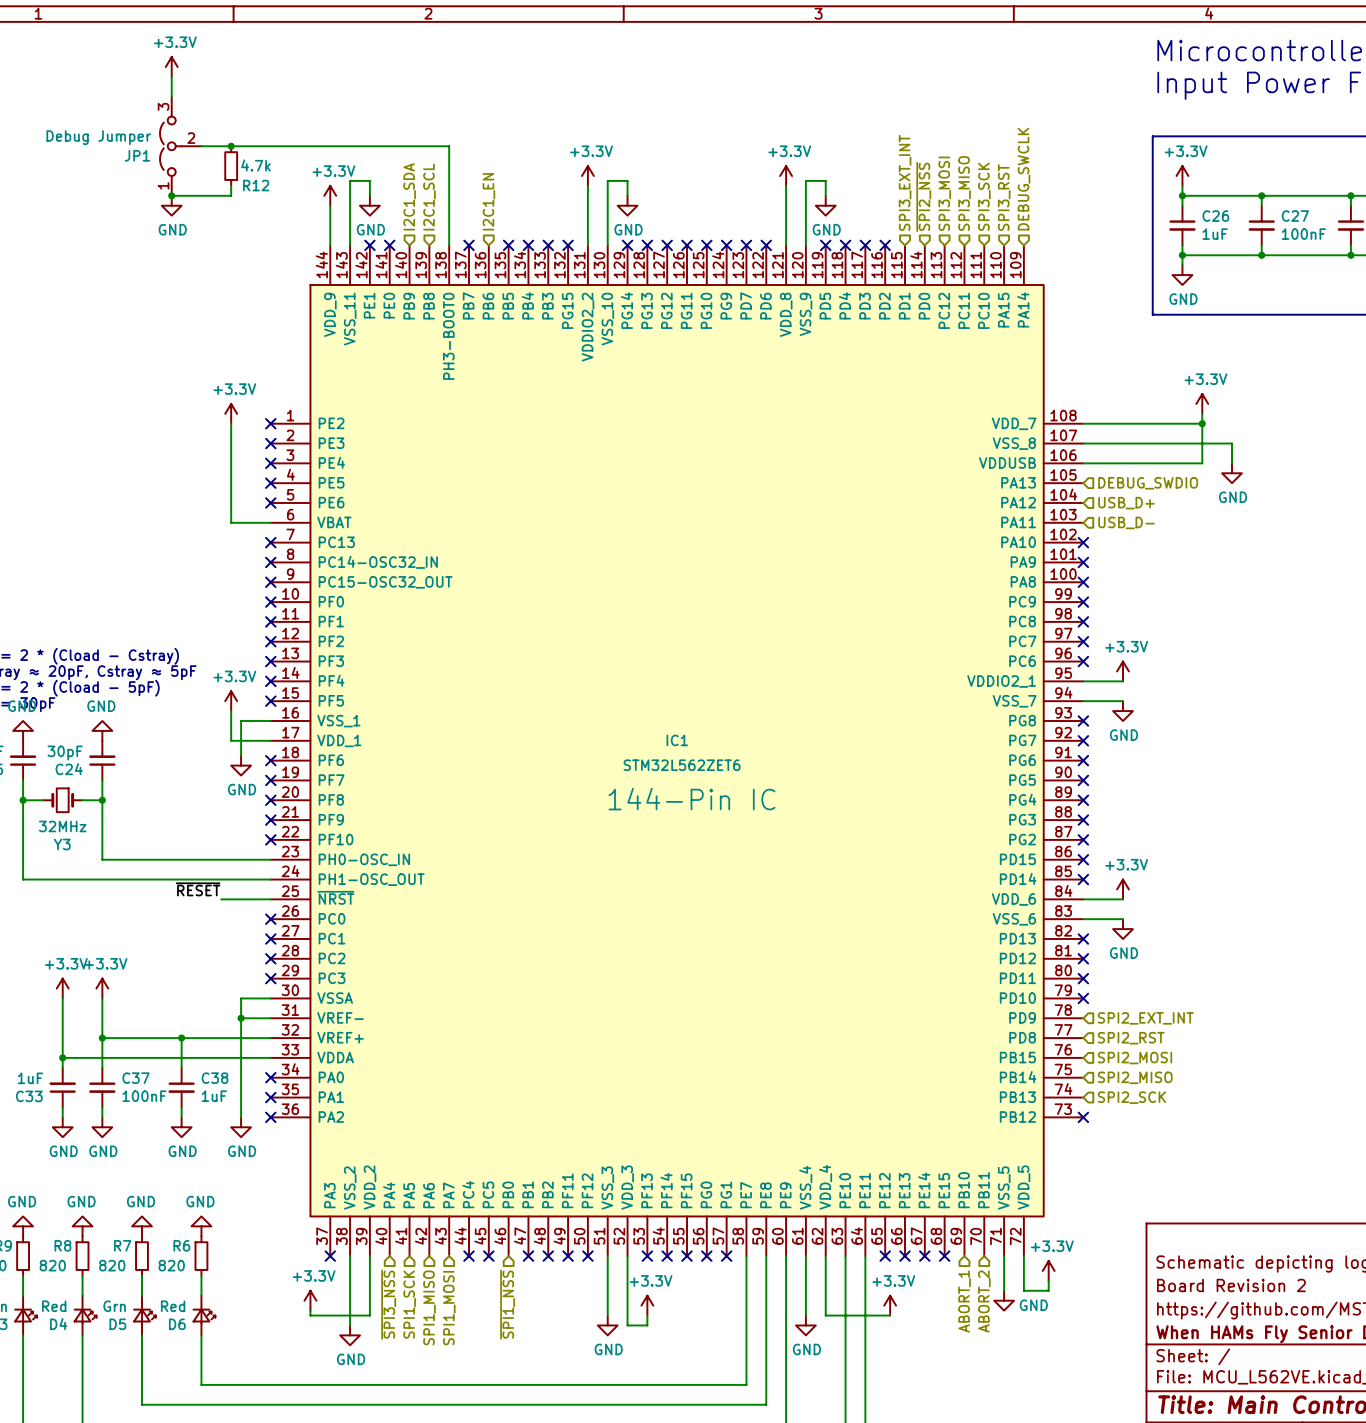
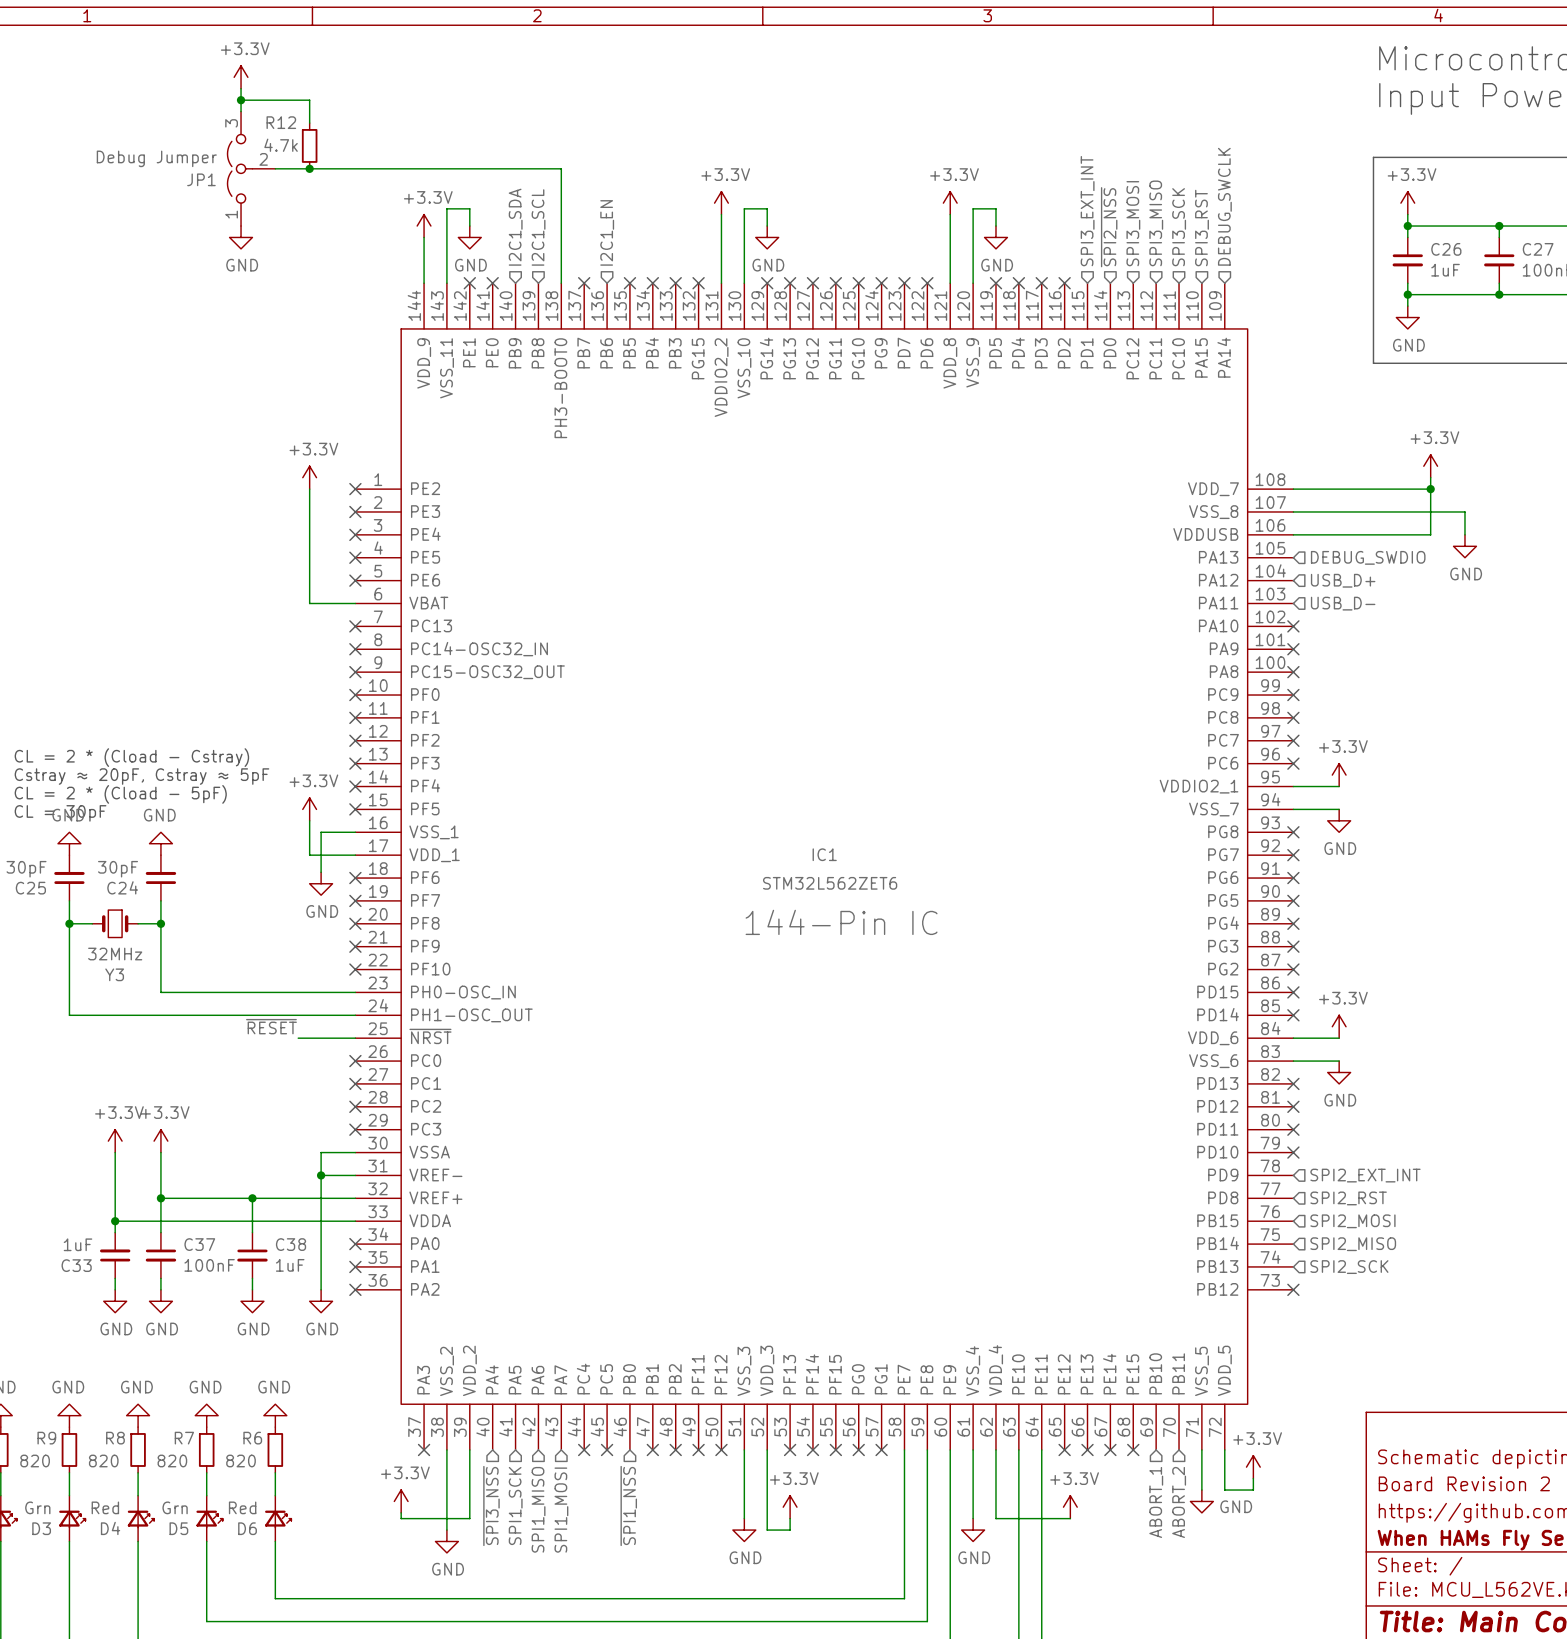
wire: none -> (241, 100) (309, 100) (309, 123)
junction: none -> (241, 100)
R12 value position: 4.7k (255, 165) -> 4.7k (281, 145)
R12 position: (231, 166) -> (309, 145)
wire: (231, 185) (231, 195) (171, 195) -> none
R12 name position: R12 (256, 185) -> R12 (281, 122)
junction: (171, 195) -> none

